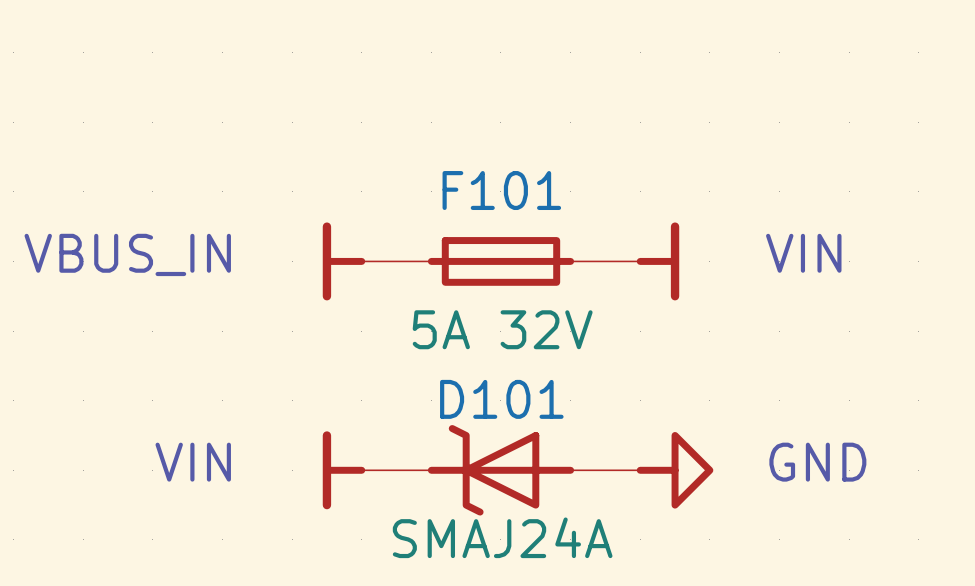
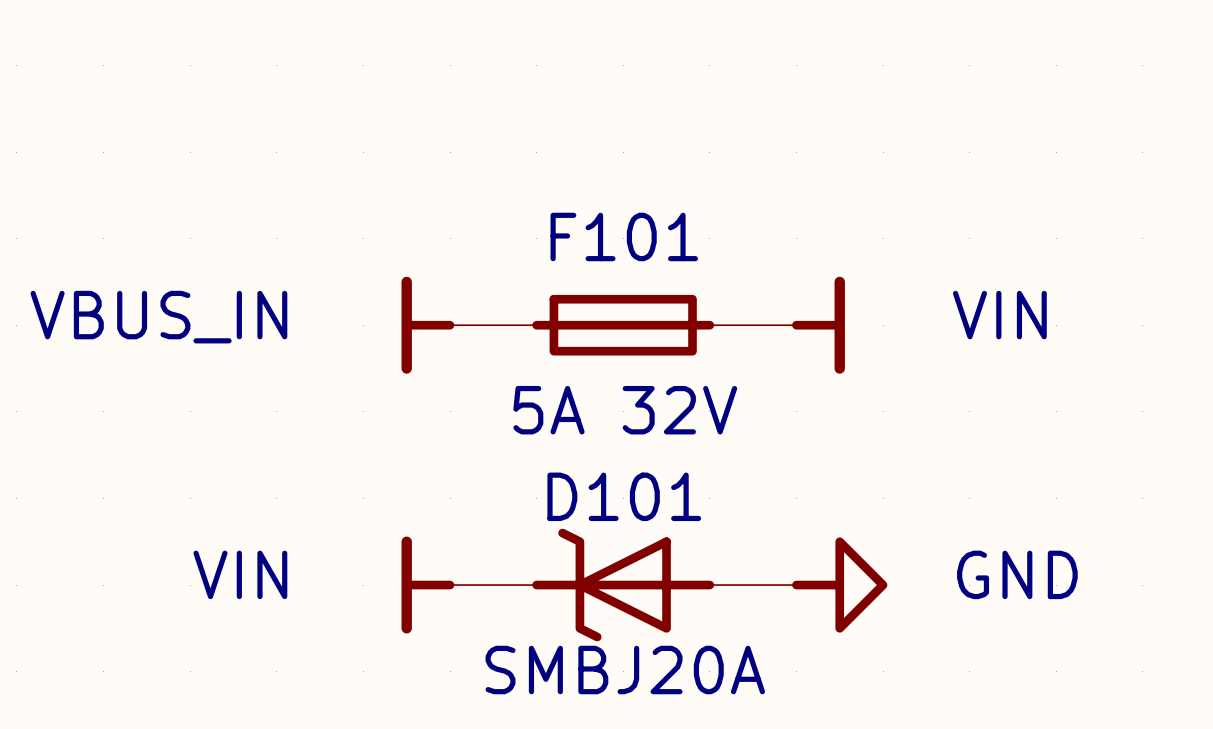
D101 value: SMAJ24A (502, 537) -> SMBJ20A (625, 670)

